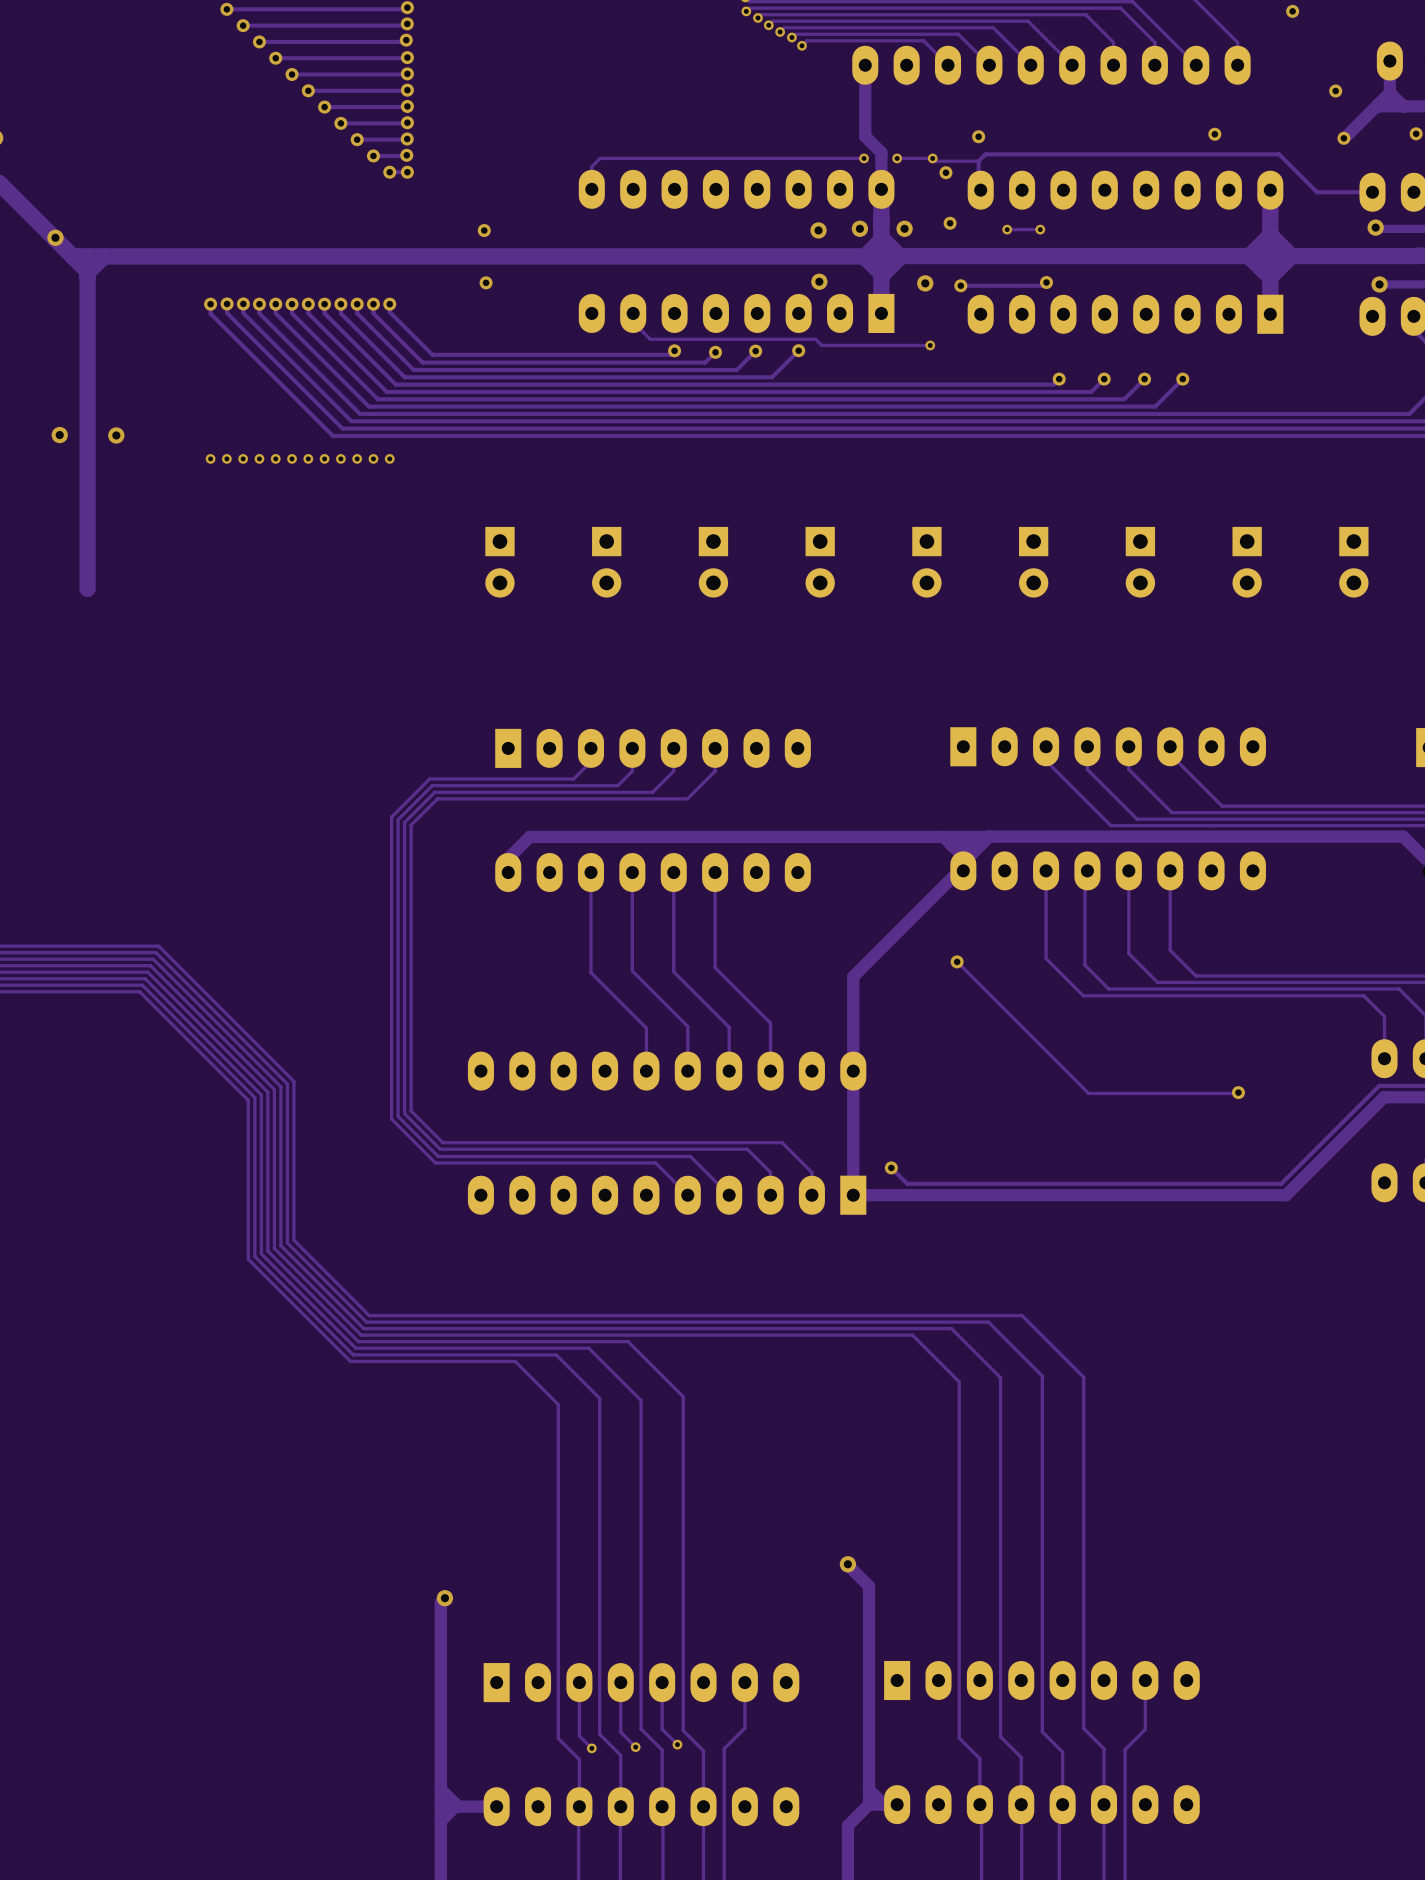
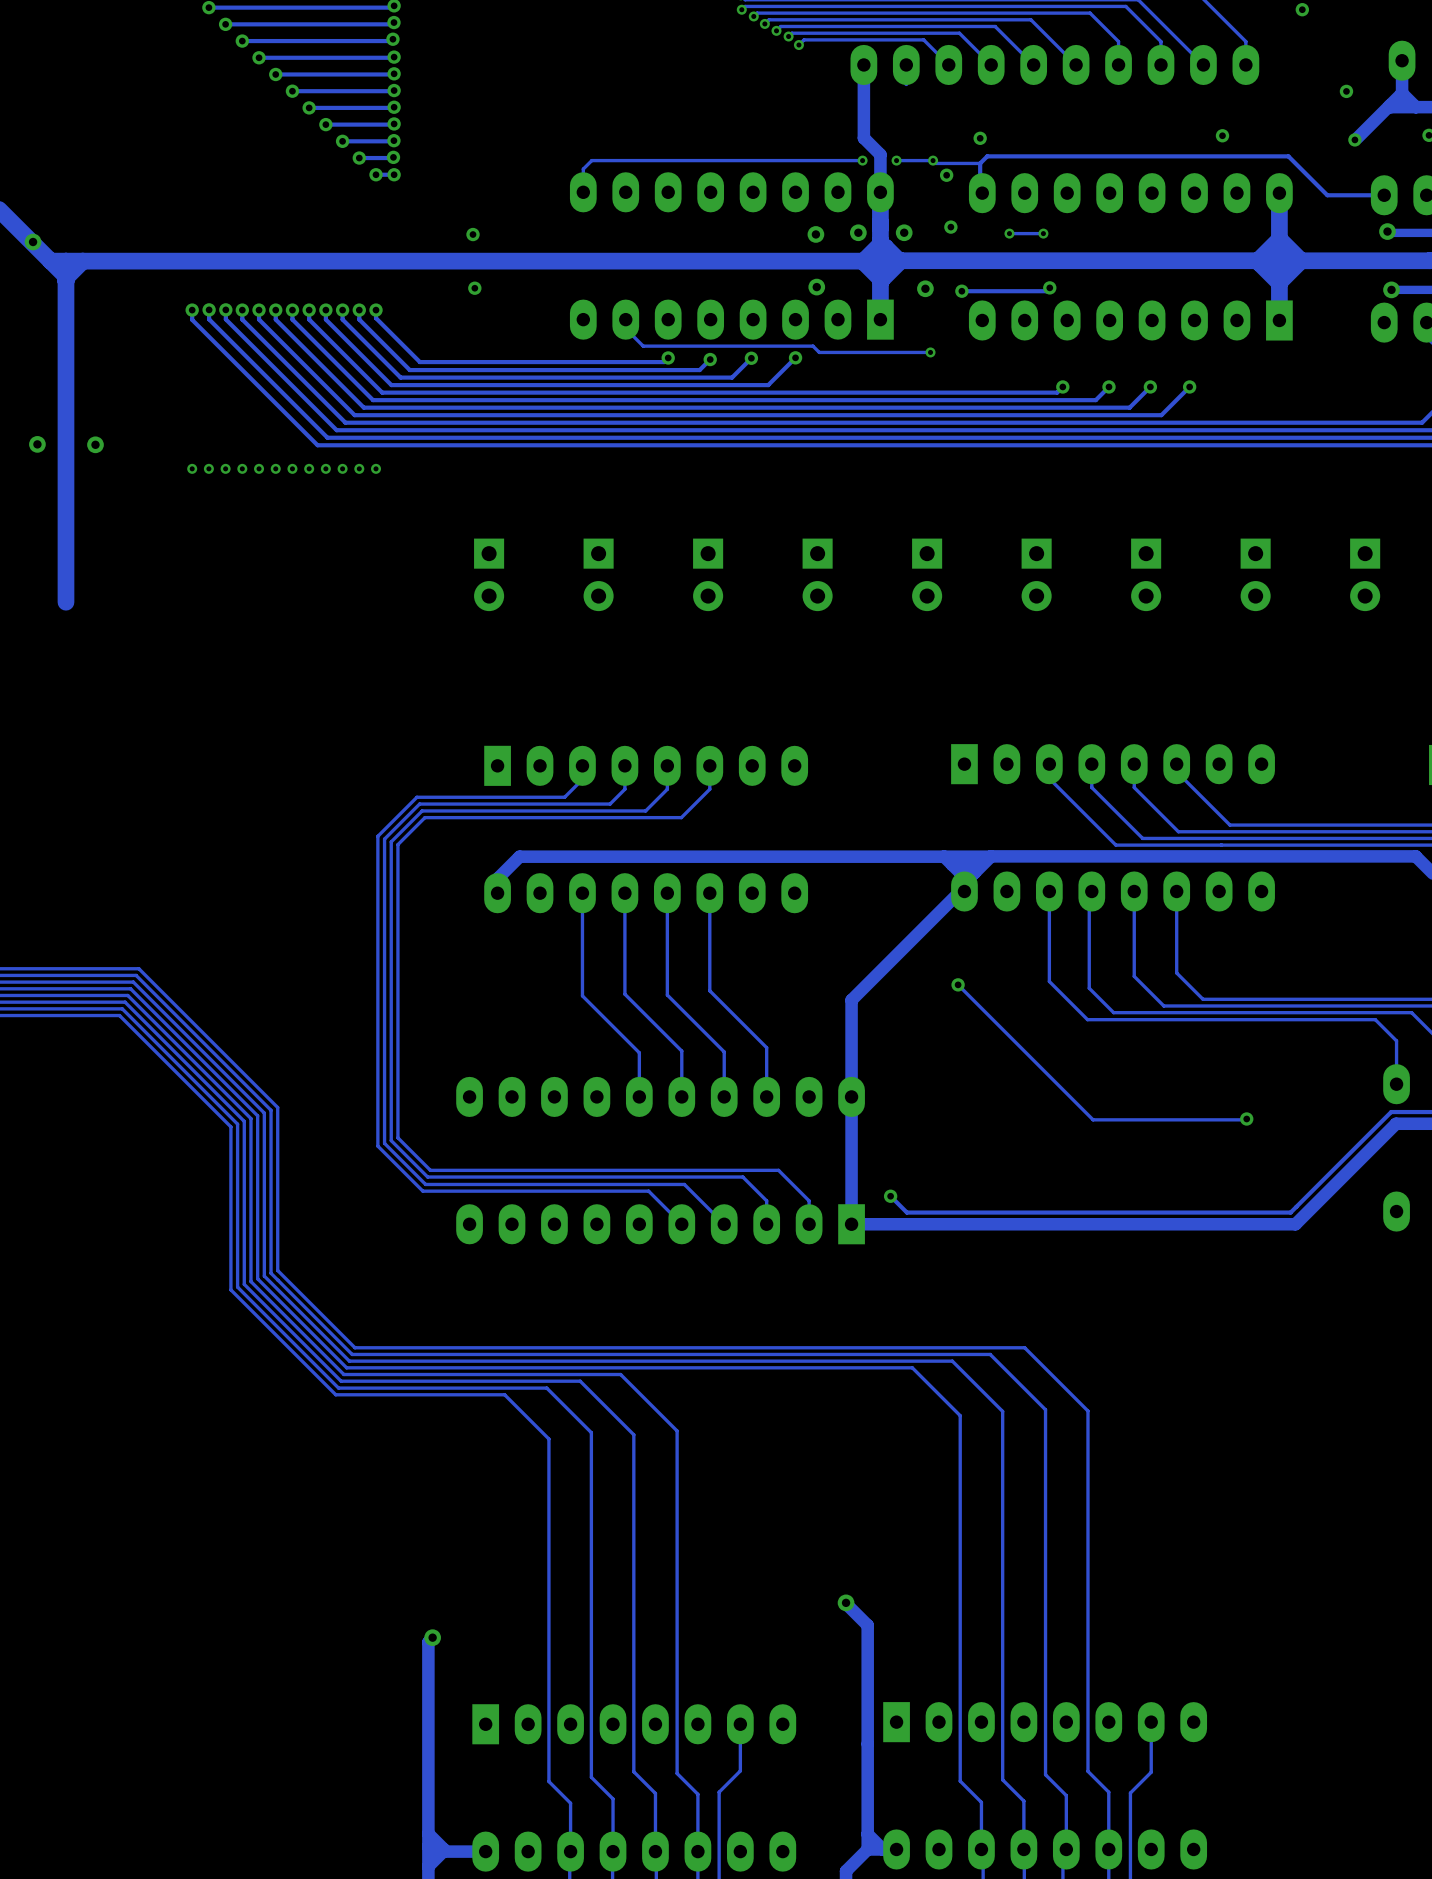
track: (579, 1682) (579, 1735) (591, 1748) -> none
track: (620, 1682) (620, 1732) (635, 1747) -> none
track: (662, 1682) (662, 1729) (677, 1744) -> none
via: (677, 1744) -> none
via: (635, 1747) -> none
via: (591, 1748) -> none

